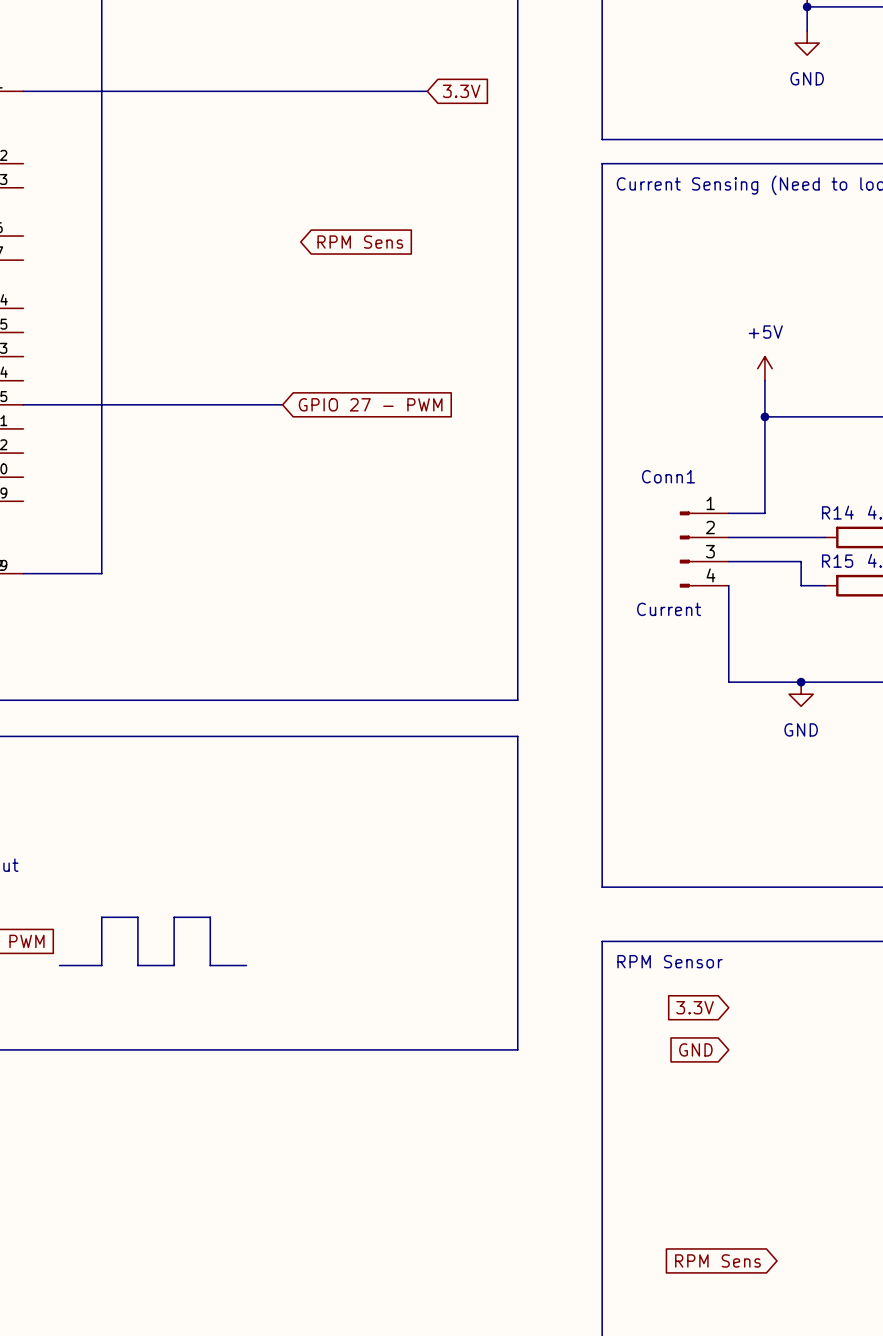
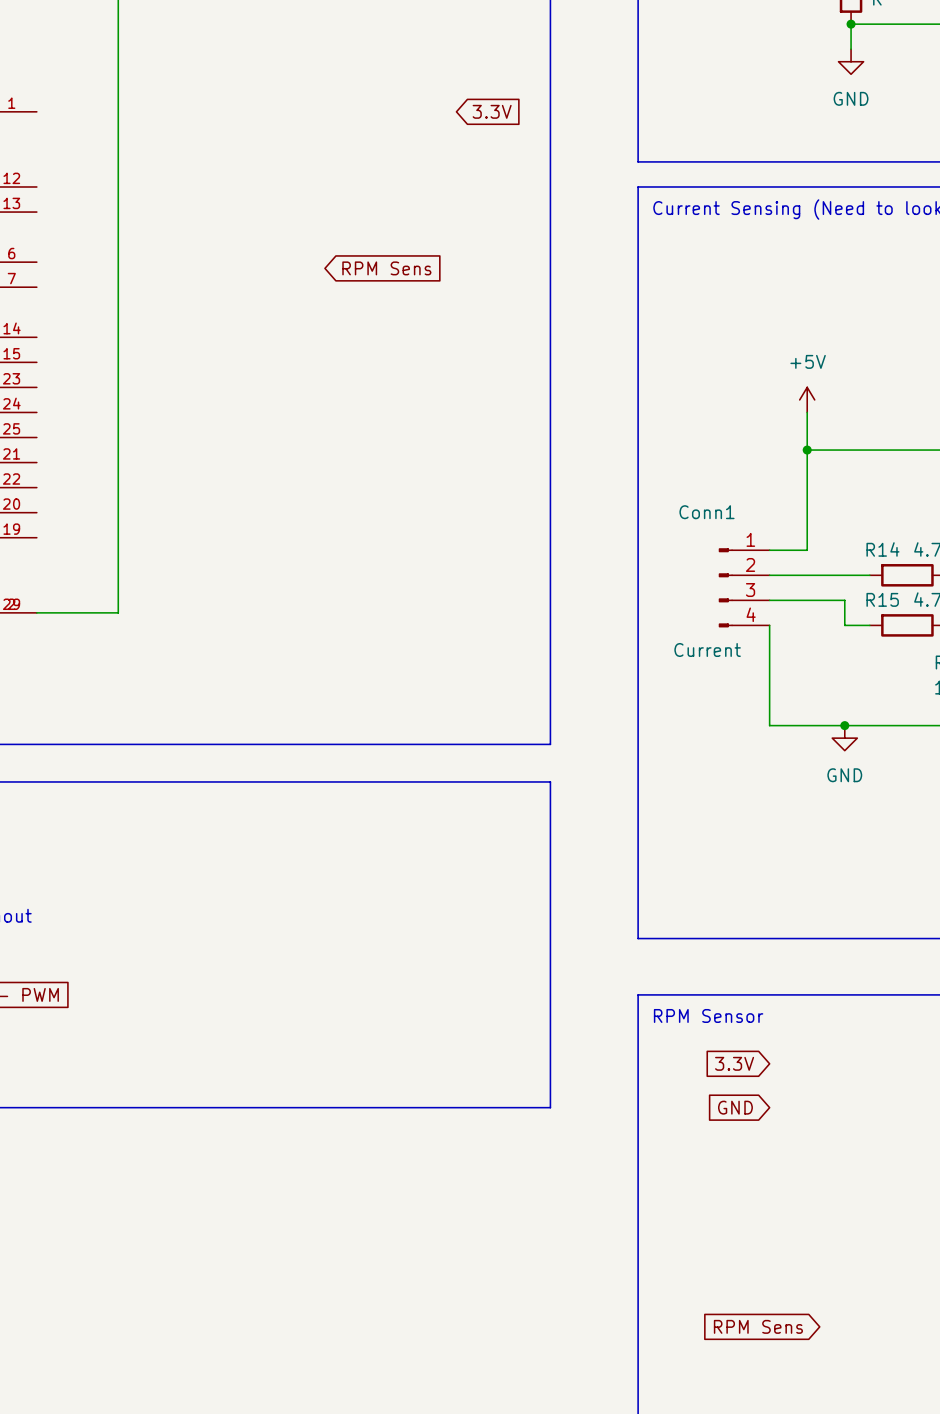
wire: (23, 91) (427, 91) -> none
wire: (23, 404) (282, 404) -> none
global label: GPIO 27 - PWM (370, 404) -> none
line: (59, 965) (101, 965) (101, 917) (137, 917) (137, 965) (174, 965) (174, 917) (210, 917) (210, 965) (246, 965) -> none

